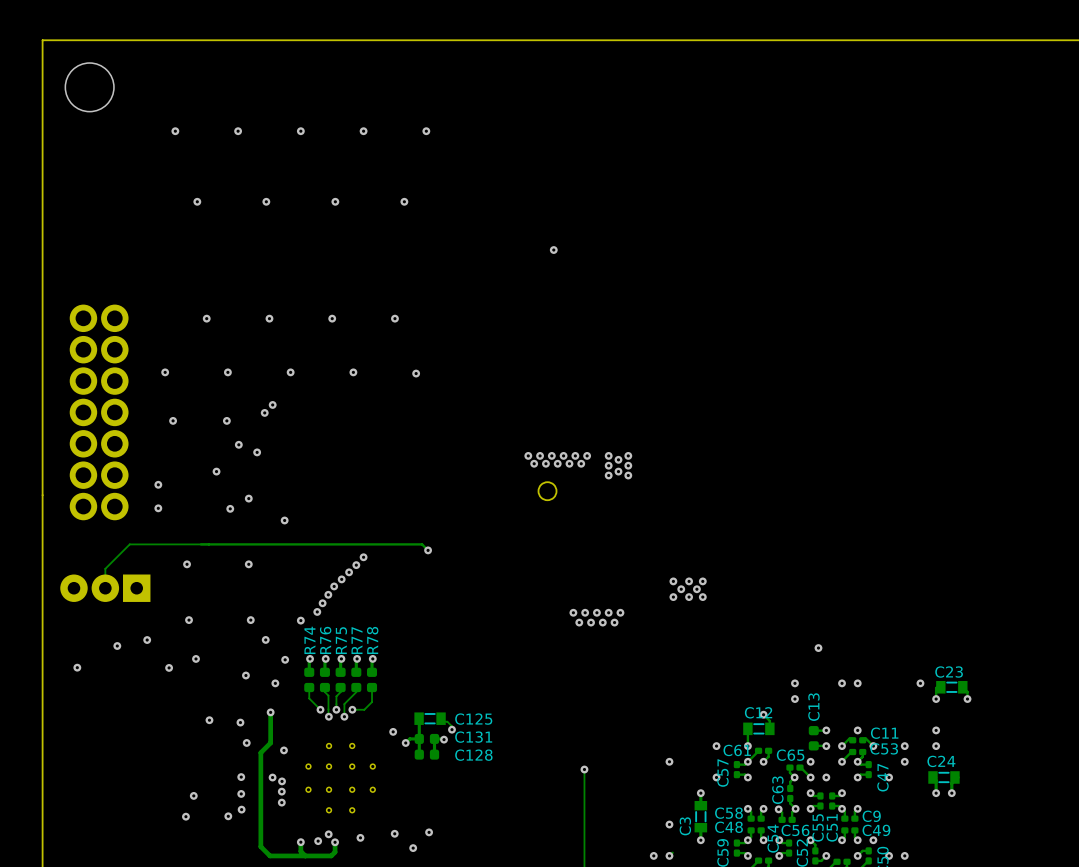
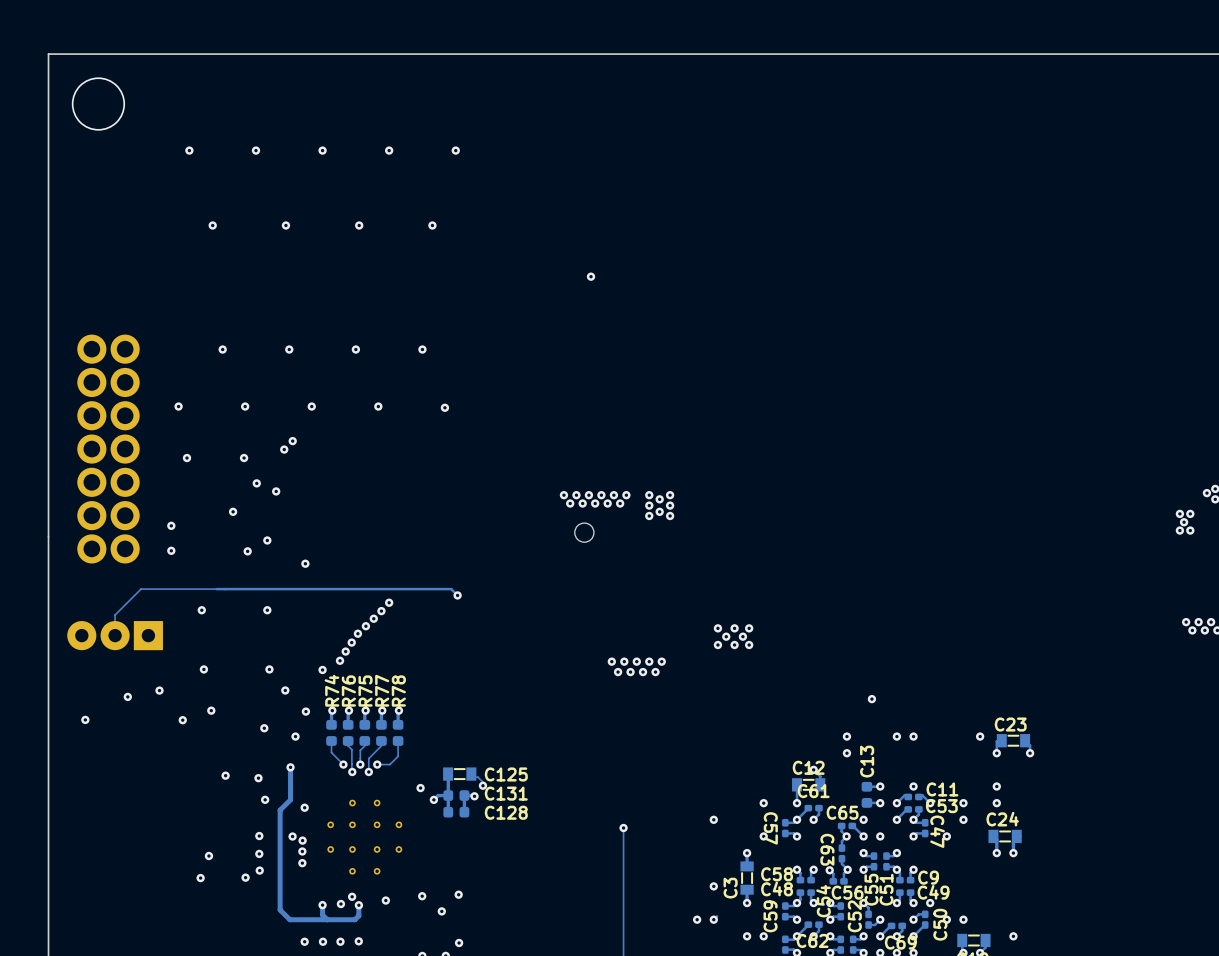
C61 name position: C61 (737, 750) -> C61 (813, 791)
C57 name rotation: 0° (722, 773) -> 180° (770, 828)
C47 name rotation: 0° (882, 777) -> 180° (937, 831)
C63 name rotation: 0° (777, 790) -> 180° (827, 849)

